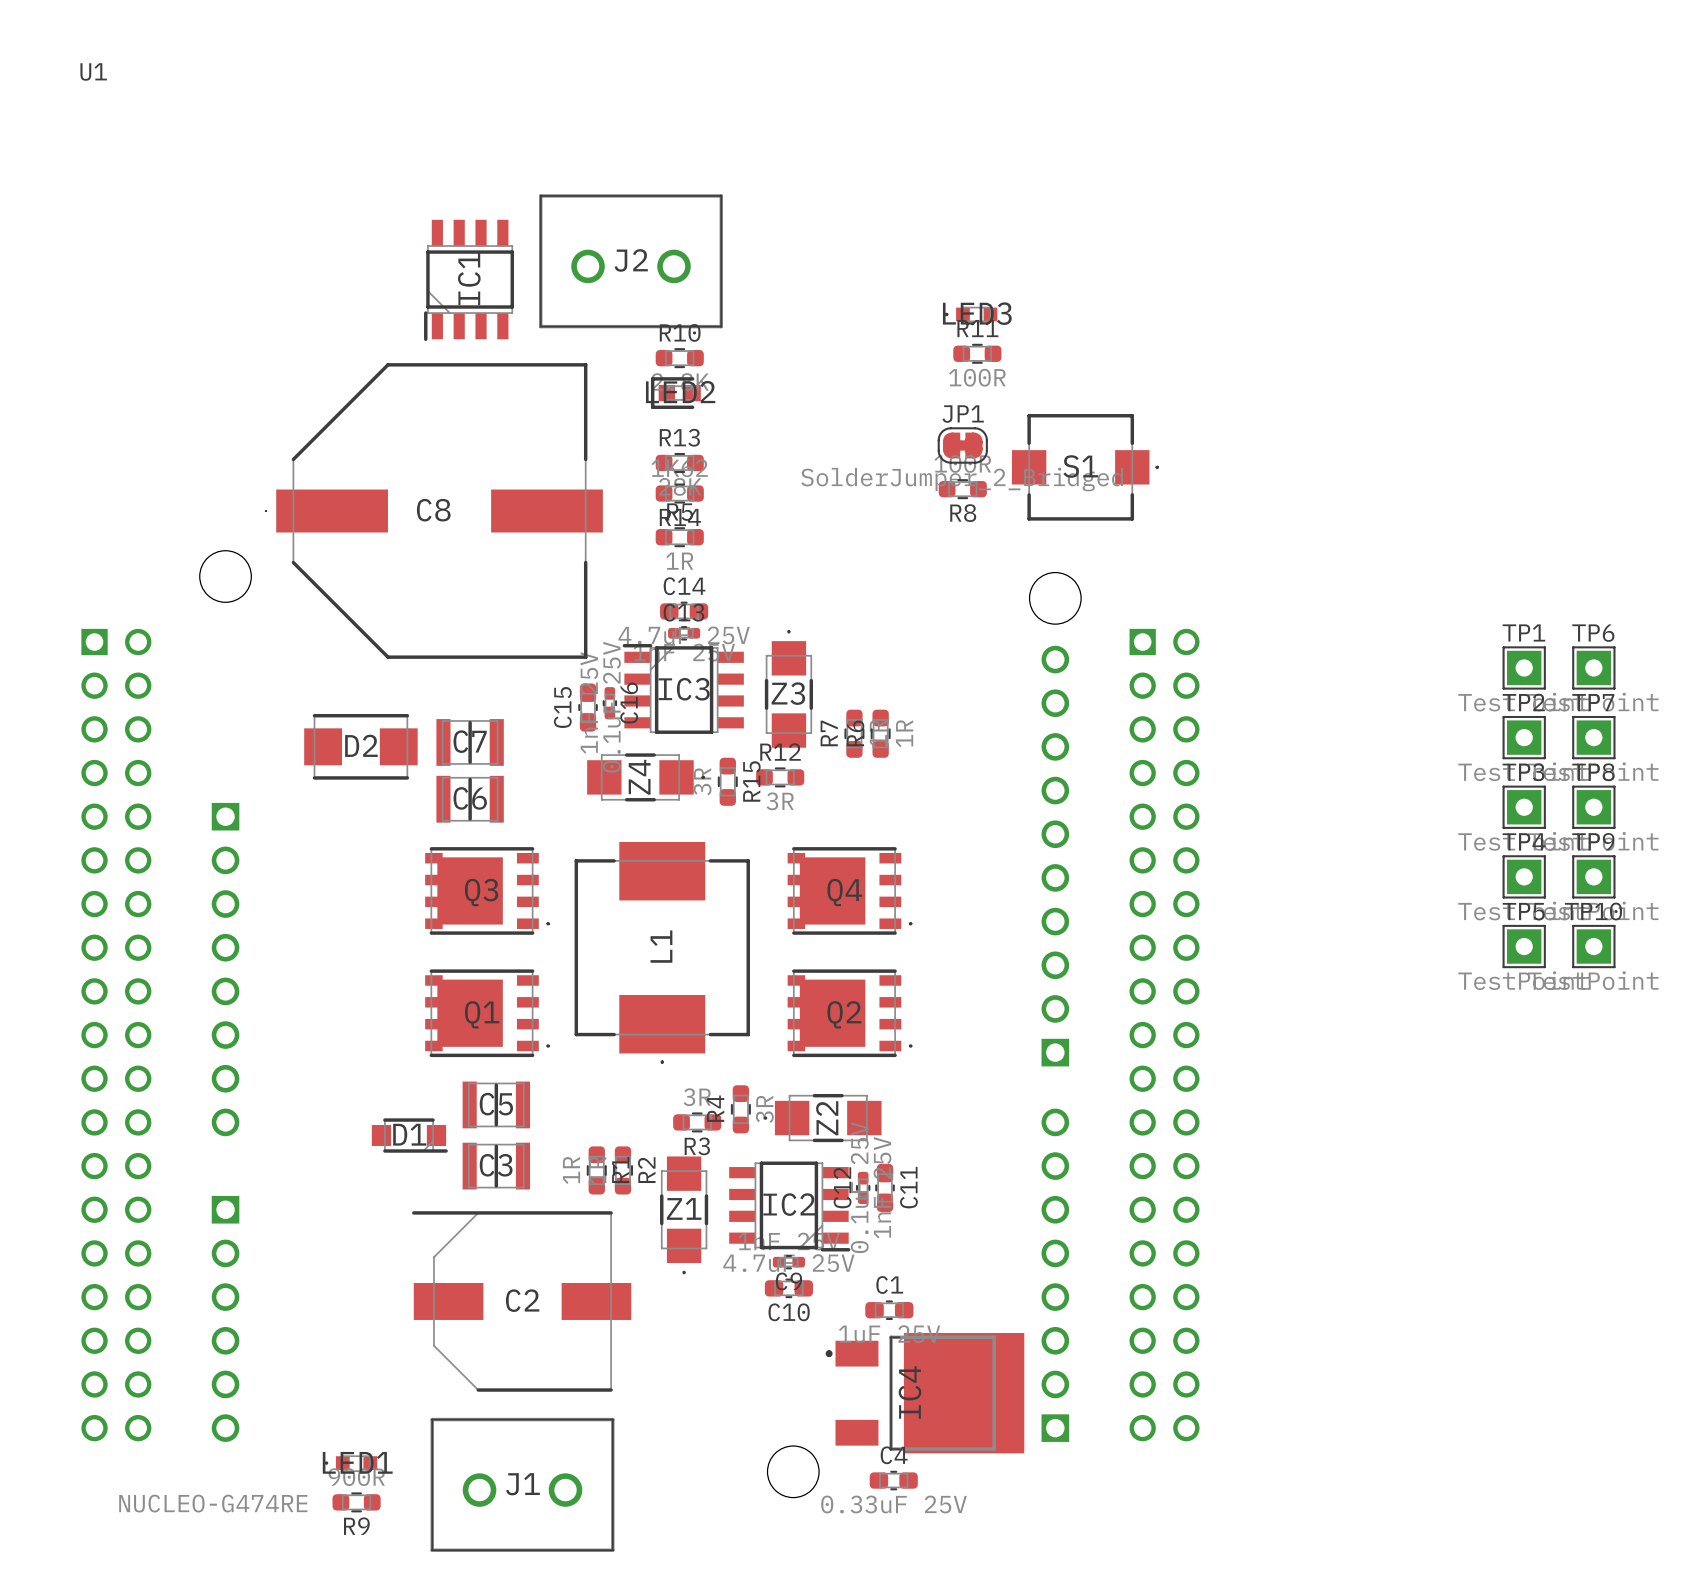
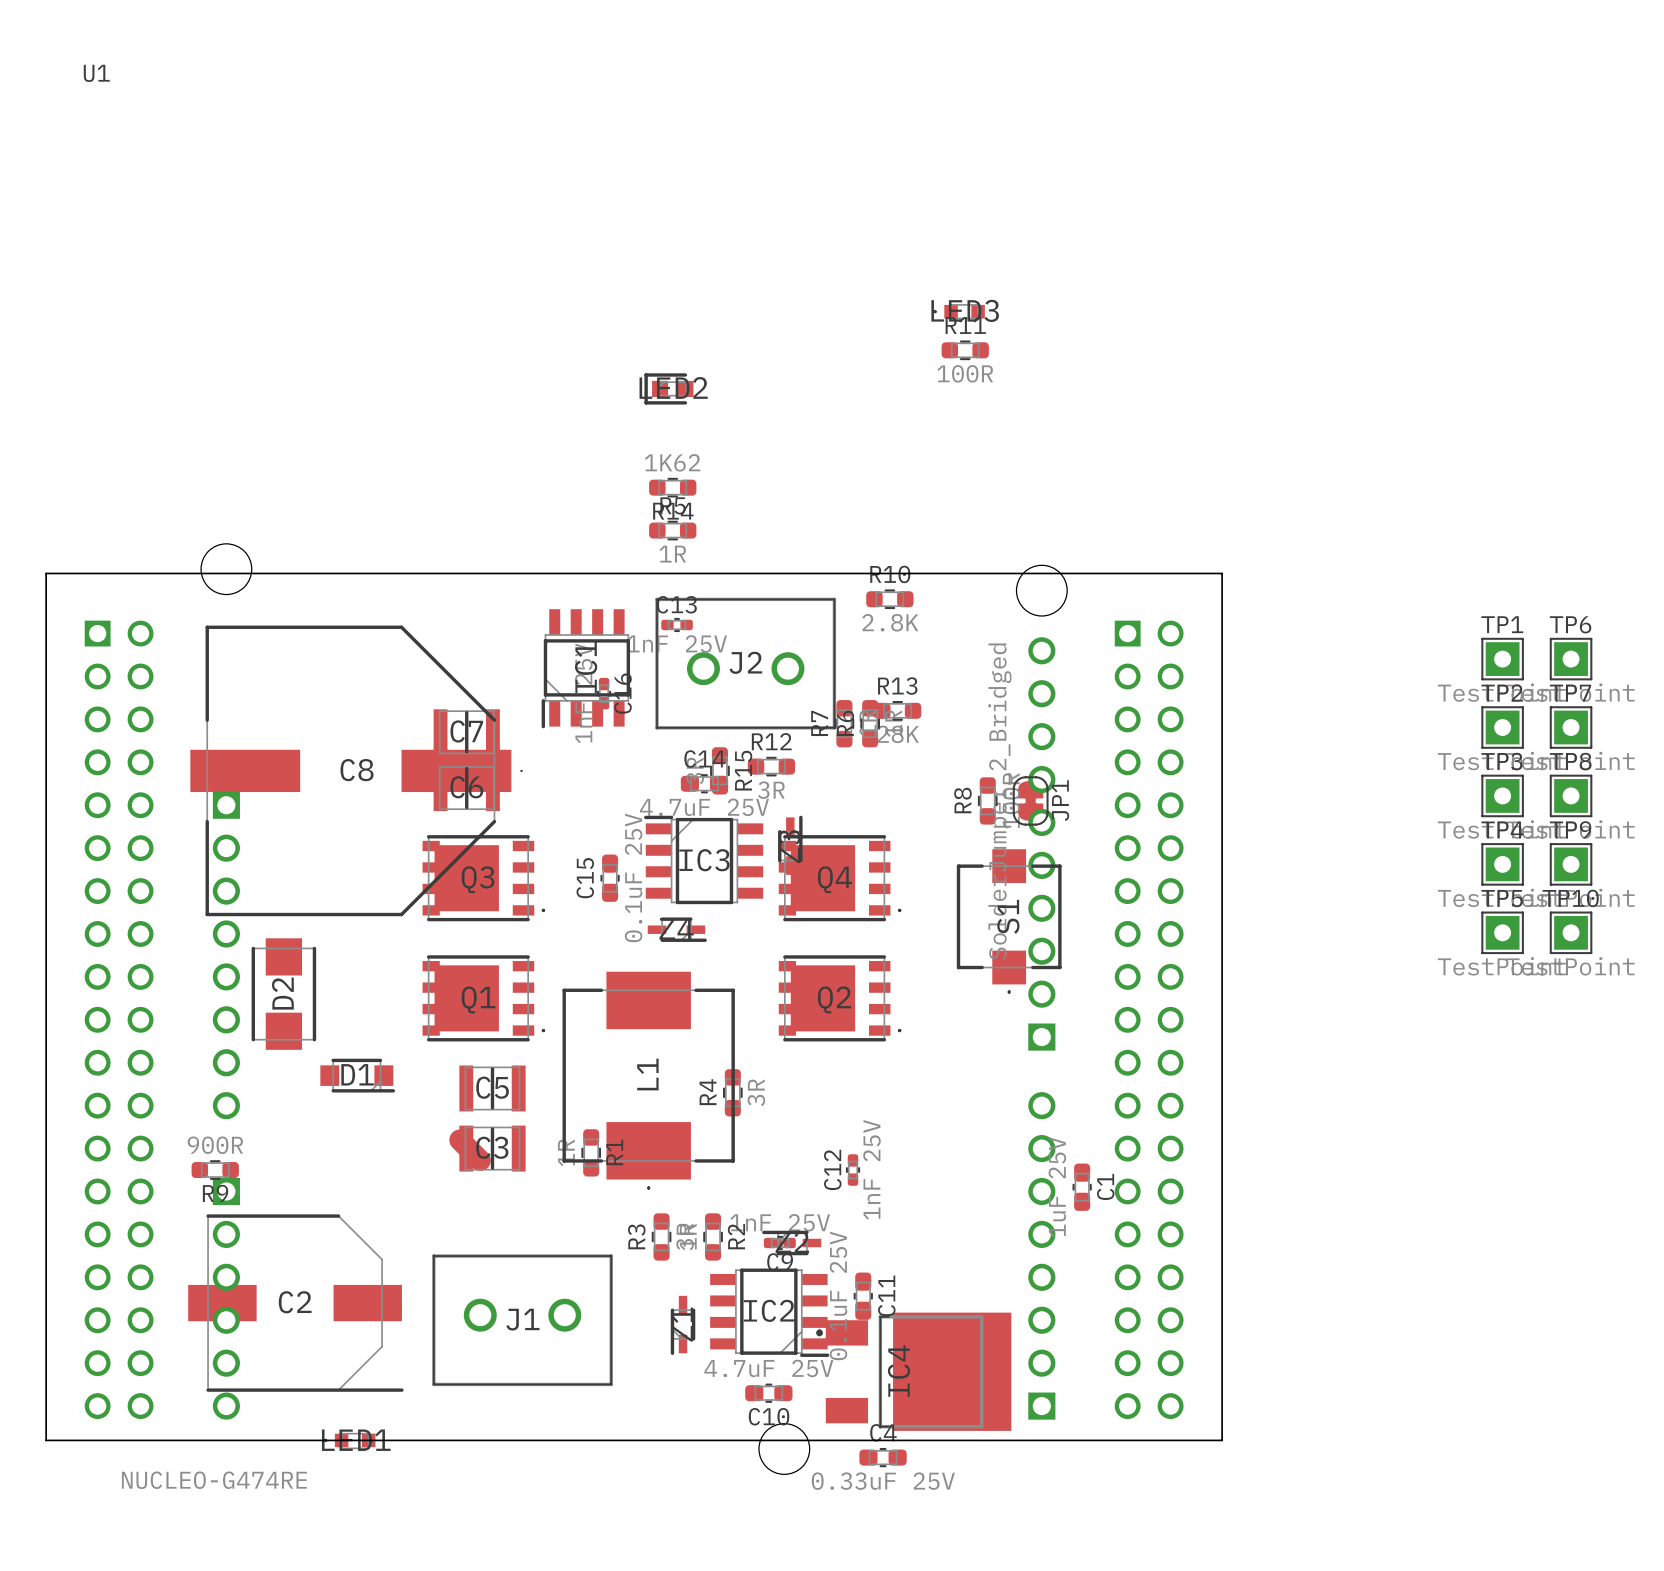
J2 position: (631, 261) -> (745, 663)
IC1 position: (469, 280) -> (585, 668)
R10 position: (679, 358) -> (889, 599)
JP1 rotation: 0° (962, 445) -> 90° clockwise (1030, 800)
JP1 position: (962, 445) -> (1030, 800)
R13 position: (679, 462) -> (897, 710)
S1 rotation: 0° (1085, 467) -> 90° clockwise (1009, 921)
S1 position: (1085, 467) -> (1009, 921)
R8 rotation: 0° (962, 489) -> 90° clockwise (987, 800)
R8 position: (962, 489) -> (987, 800)
C8 rotation: 0° (433, 511) -> 180° (356, 770)
C8 position: (433, 511) -> (356, 770)
board edge: none -> (46, 573) (46, 1440) (1222, 1440) (1222, 573) (46, 573)
C14 position: (684, 611) -> (704, 783)
Z3 footprint: [764, 629, 814, 748] -> [778, 815, 803, 875]
IC3 position: (683, 688) -> (703, 859)
C15 position: (588, 707) -> (610, 878)
D2 rotation: 0° (360, 746) -> 90° clockwise (283, 994)
D2 position: (360, 746) -> (283, 994)
Z4 footprint: [587, 753, 705, 802] -> [647, 917, 707, 942]
L1 position: (662, 952) -> (648, 1080)
Z2 footprint: [763, 1093, 882, 1143] -> [762, 1230, 822, 1256]
R3 rotation: 0° (697, 1122) -> 90° clockwise (661, 1236)
R3 position: (697, 1122) -> (661, 1236)
D1 position: (409, 1135) -> (357, 1075)
Z1 footprint: [660, 1156, 709, 1275] -> [670, 1295, 696, 1355]
top track: none -> (459, 1139) (480, 1160)
R2 position: (622, 1170) -> (713, 1236)
C11 position: (885, 1187) -> (863, 1296)
IC2 position: (789, 1206) -> (769, 1312)
C10 position: (788, 1288) -> (768, 1393)
C2 rotation: 0° (521, 1301) -> 180° (295, 1303)
C2 position: (521, 1301) -> (295, 1303)
C1 rotation: 0° (889, 1310) -> 90° clockwise (1082, 1187)
C1 position: (889, 1310) -> (1082, 1187)
J1 rotation: 0° (522, 1484) -> 180° (522, 1320)
J1 position: (522, 1484) -> (522, 1320)
R9 position: (356, 1502) -> (215, 1170)

